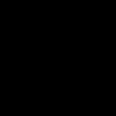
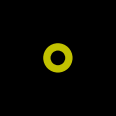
part: none -> (57, 57)

